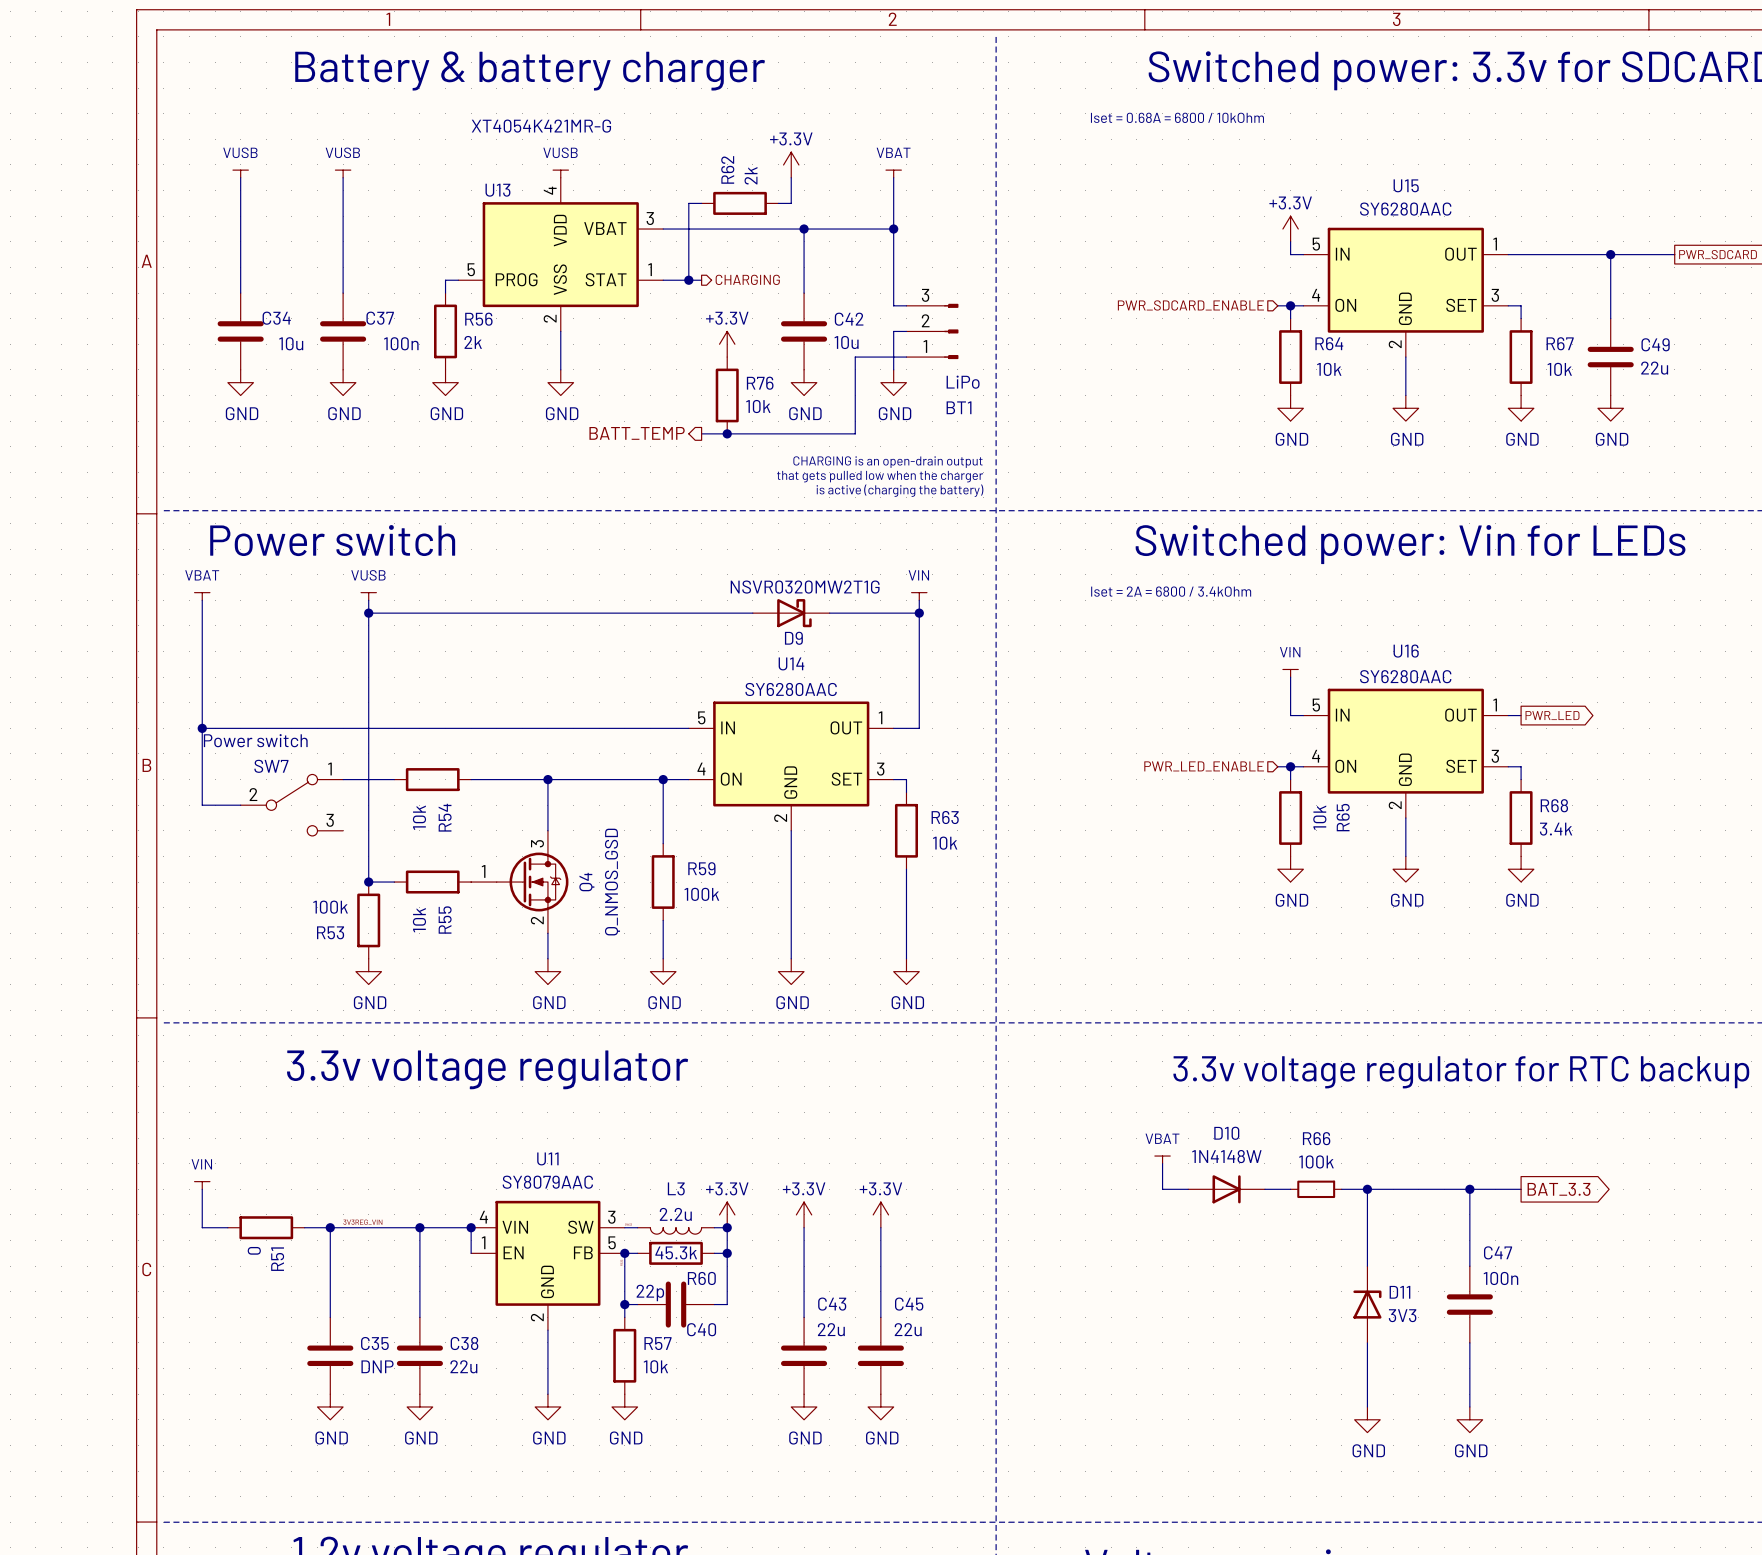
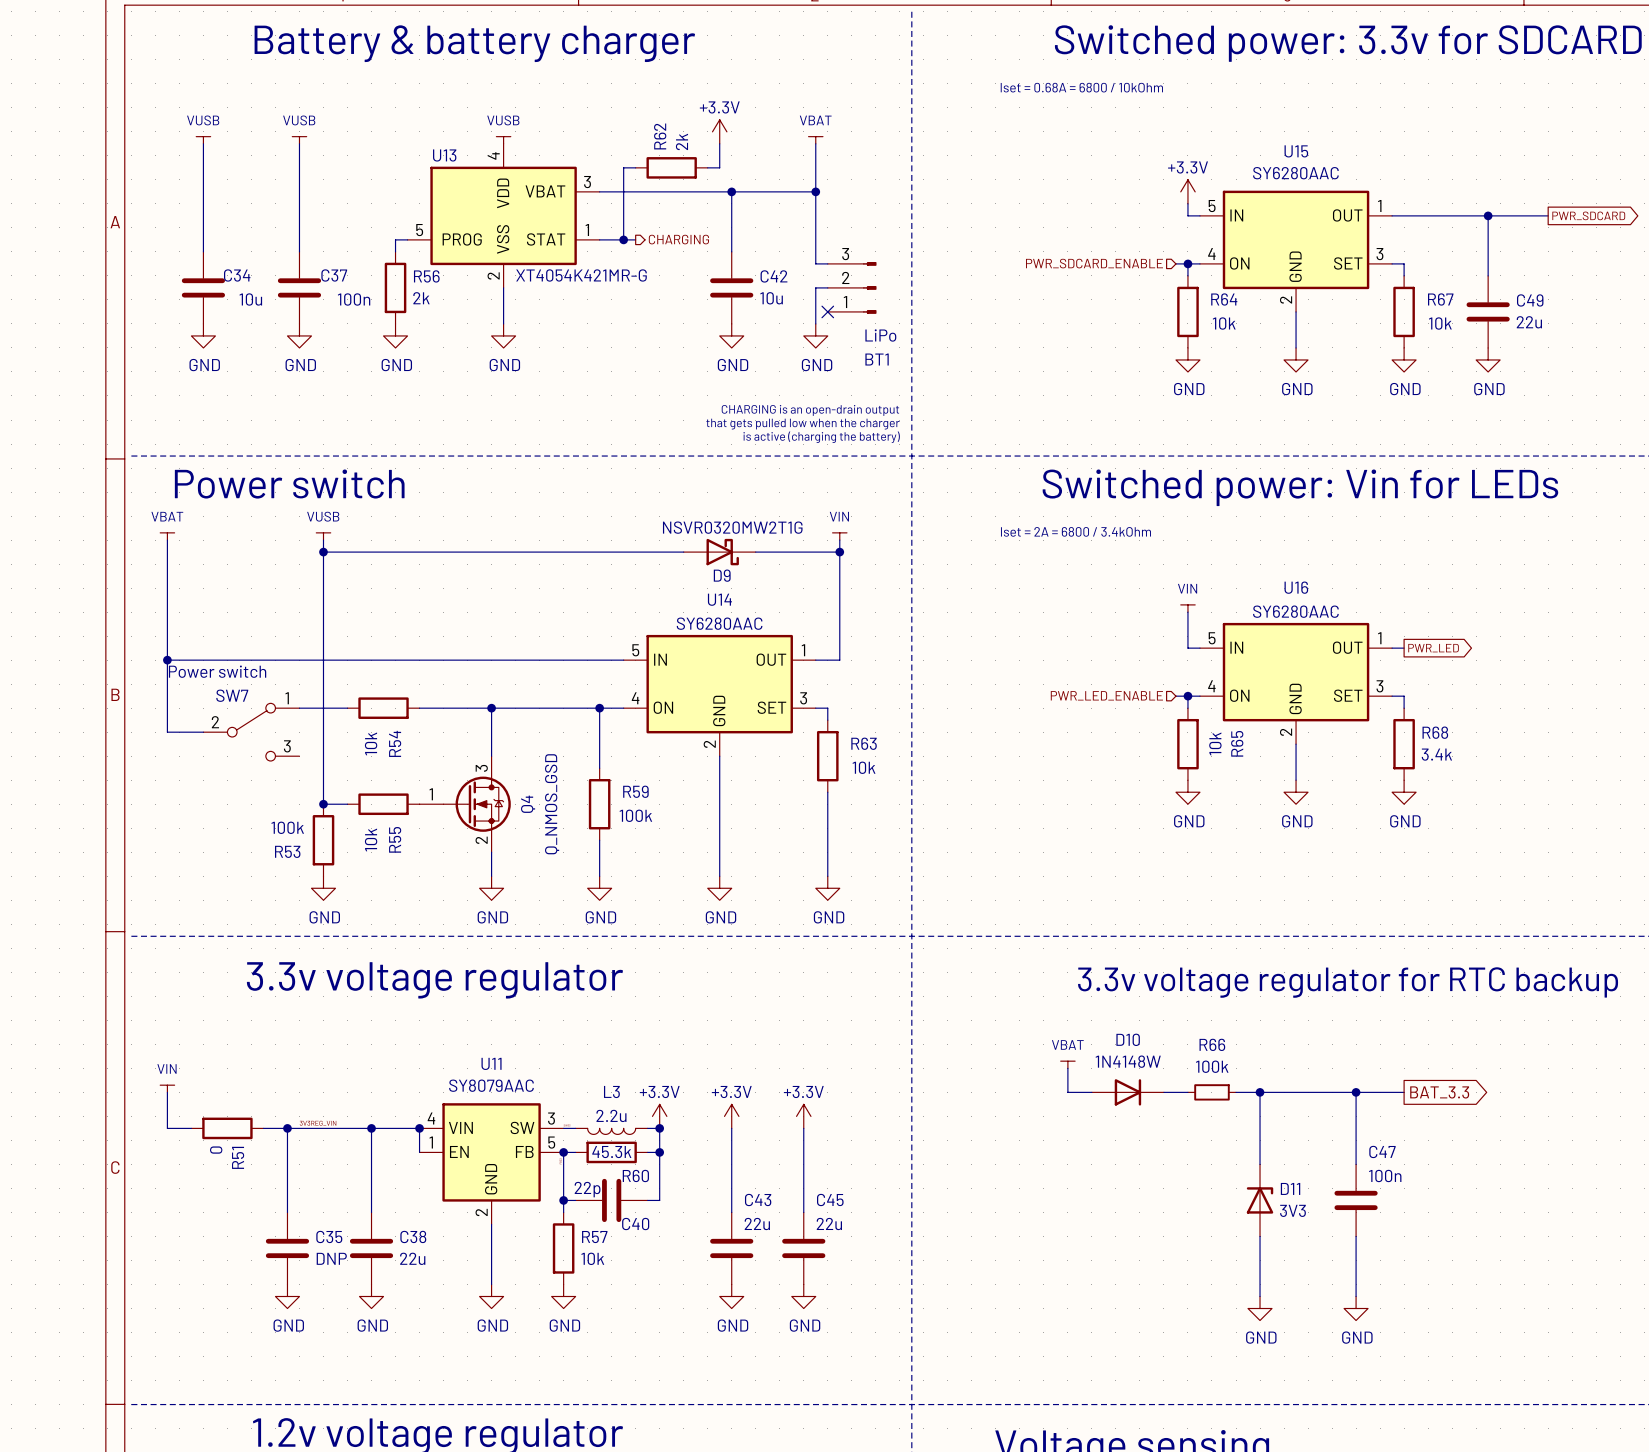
U13 value position: XT4054K421MR-G (541, 126) -> XT4054K421MR-G (581, 275)
power symbol: +3.3V (727, 344) -> none
wire: (906, 357) (855, 357) (855, 433) (701, 433) -> none
no-connect mark: none -> (827, 311)
R76: 10k (727, 395) -> none
hierarchical label: BATT_TEMP (637, 433) -> none
junction: (727, 433) -> none

